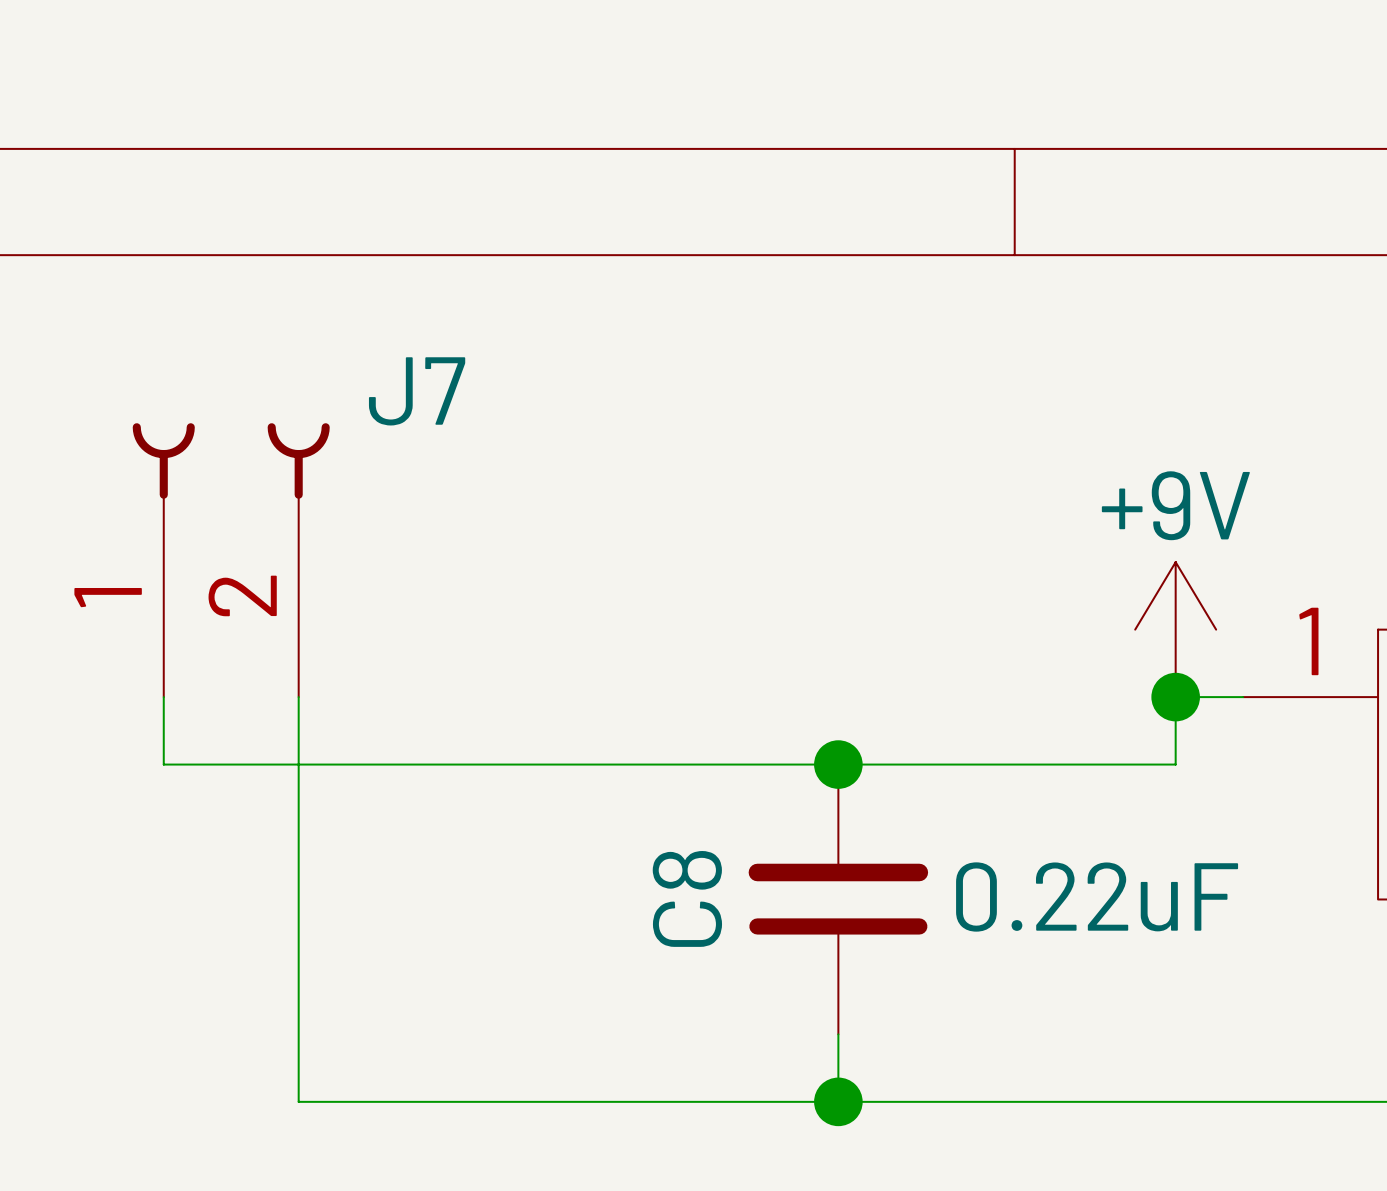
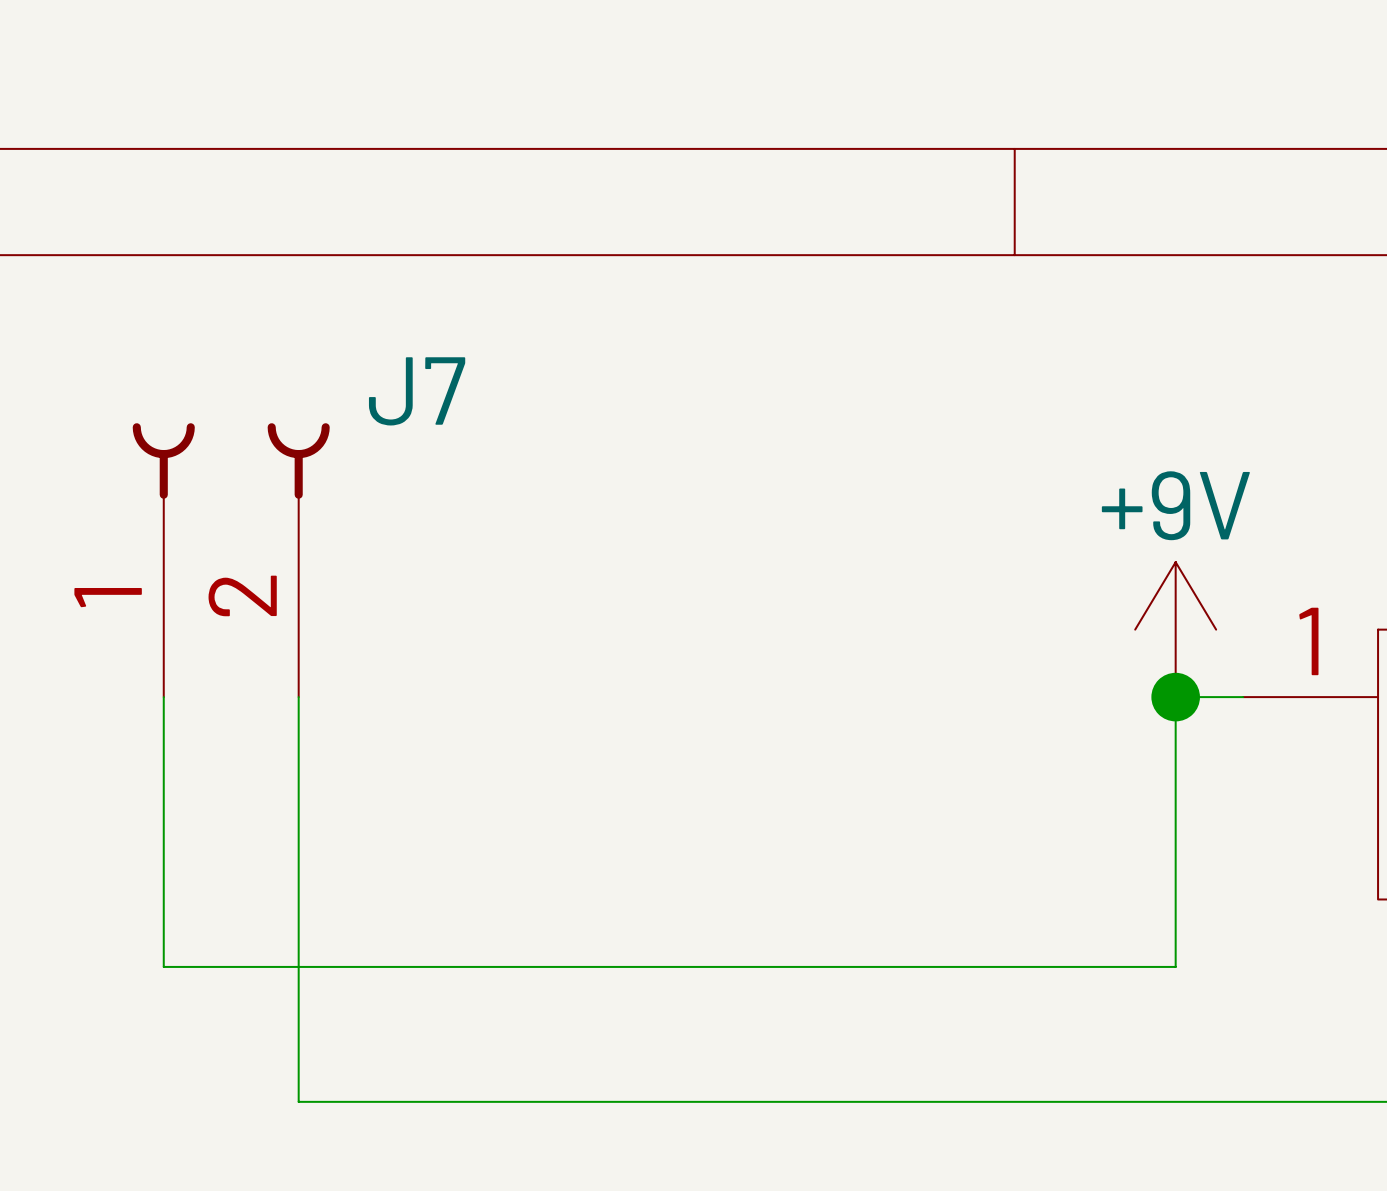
wire: (163, 764) (1175, 764) -> (163, 764) (163, 966) (1175, 966) (1175, 764)
junction: (838, 764) -> none
C8: 0.22uF (838, 899) -> none
wire: (838, 1034) (838, 1101) -> none
junction: (838, 1101) -> none

